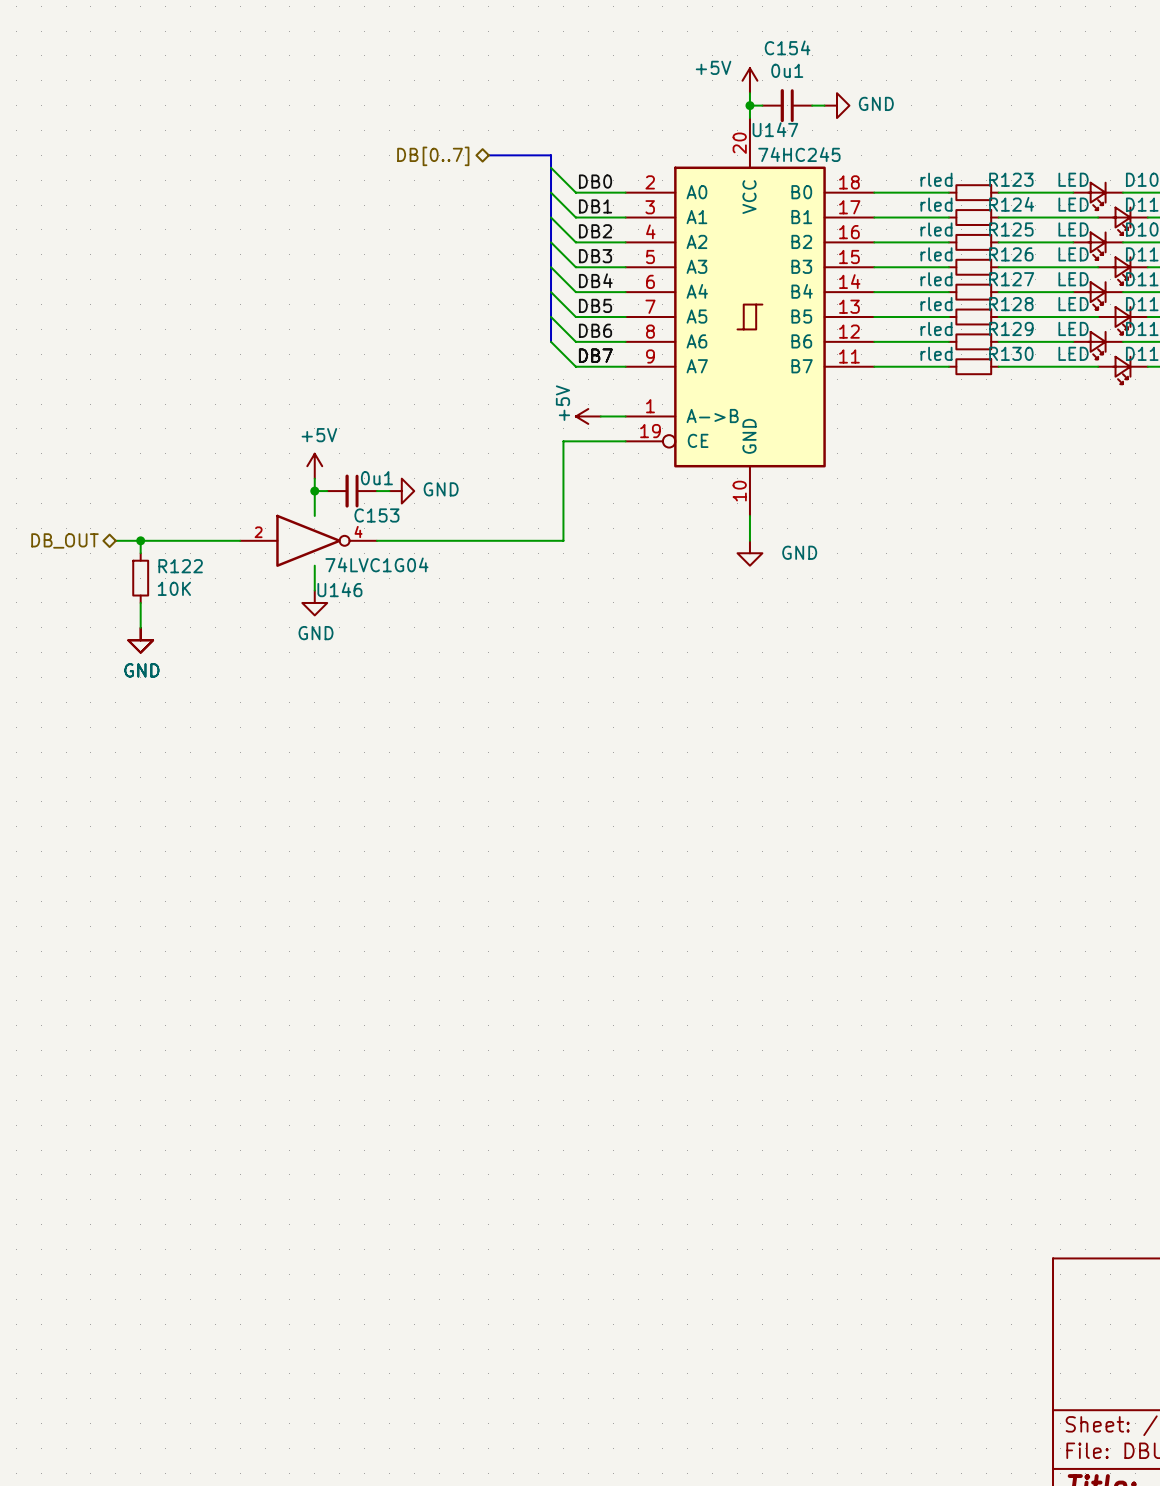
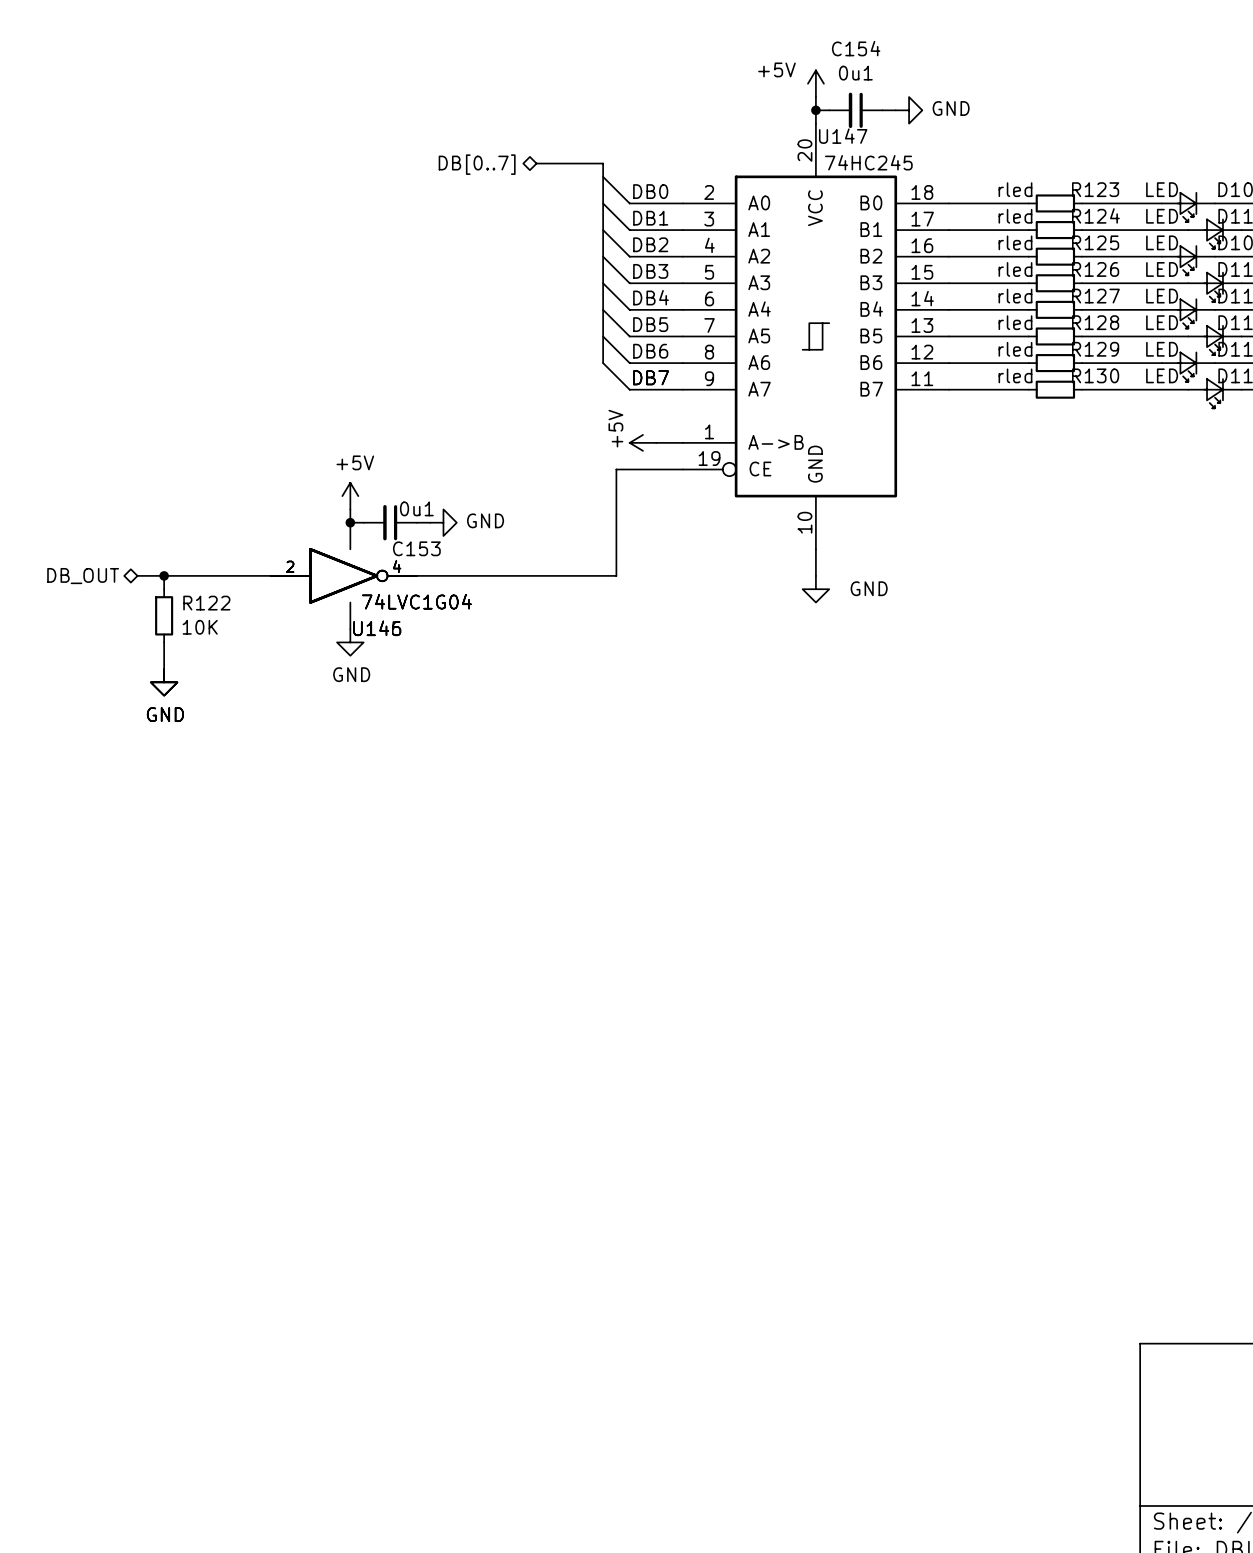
part: none -> 74LVC1G04 (343, 575)

